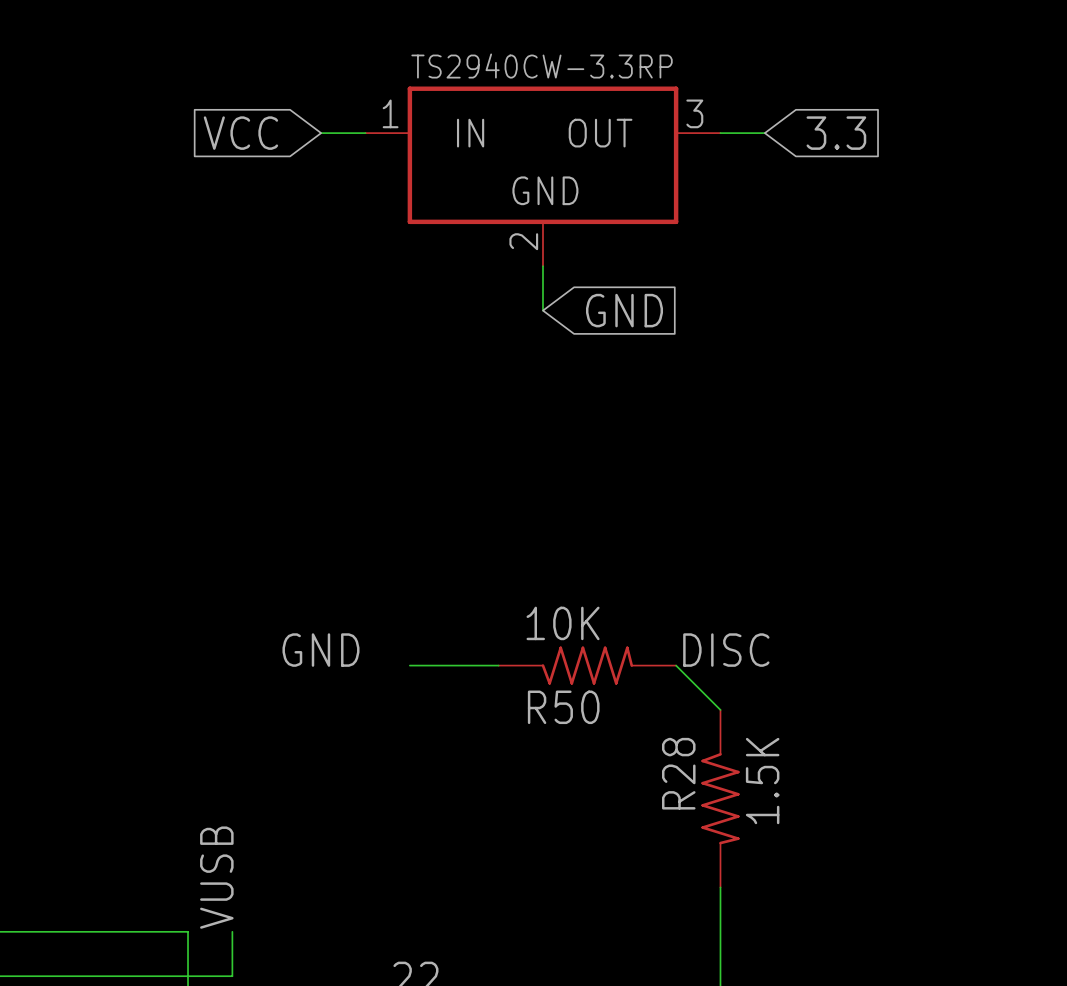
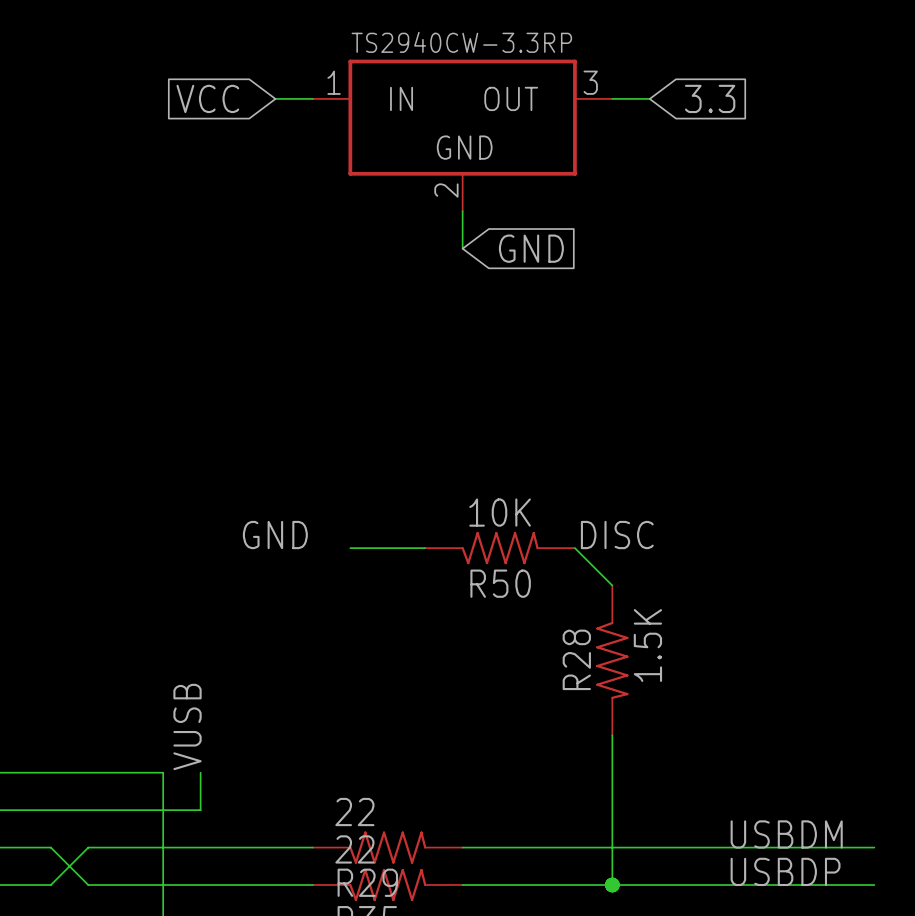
R50 value position: 10K (563, 623) -> 10K (500, 512)
R50 name position: R50 (563, 707) -> R50 (500, 583)
R28 name position: R28 (678, 773) -> R28 (576, 659)

